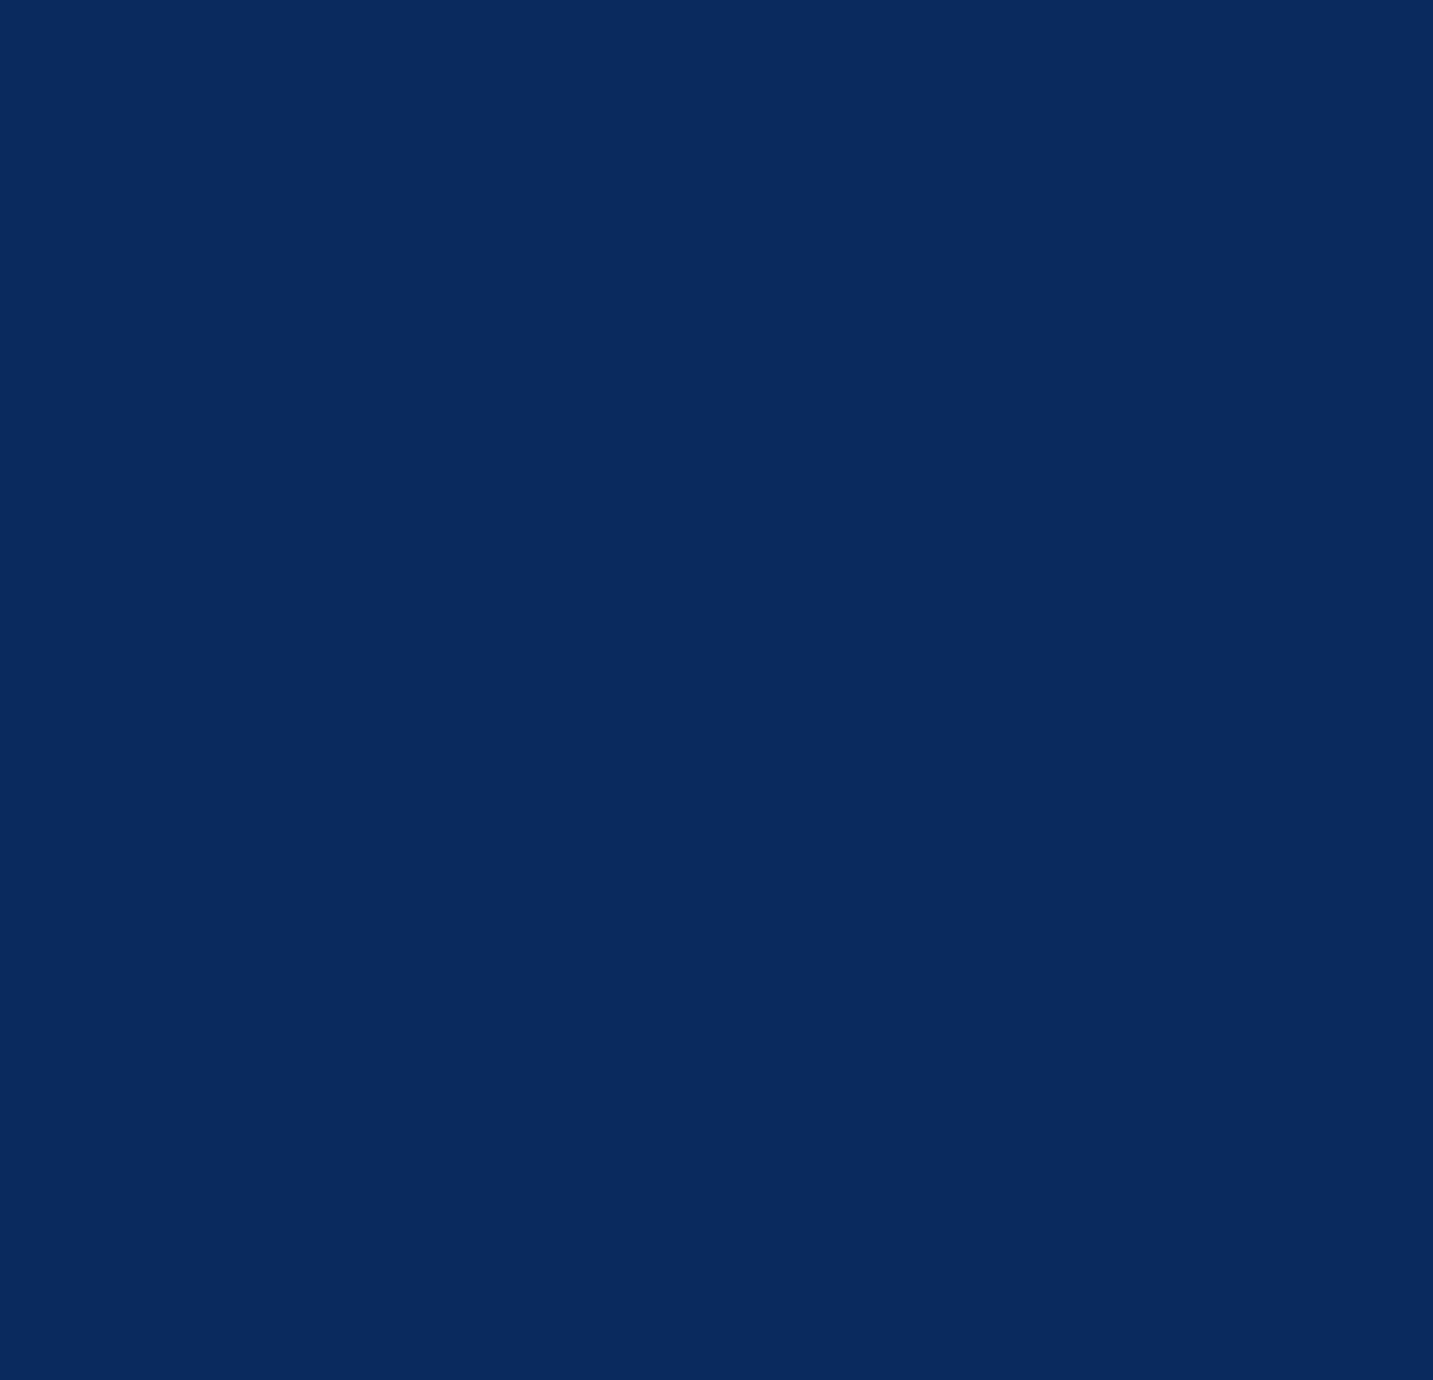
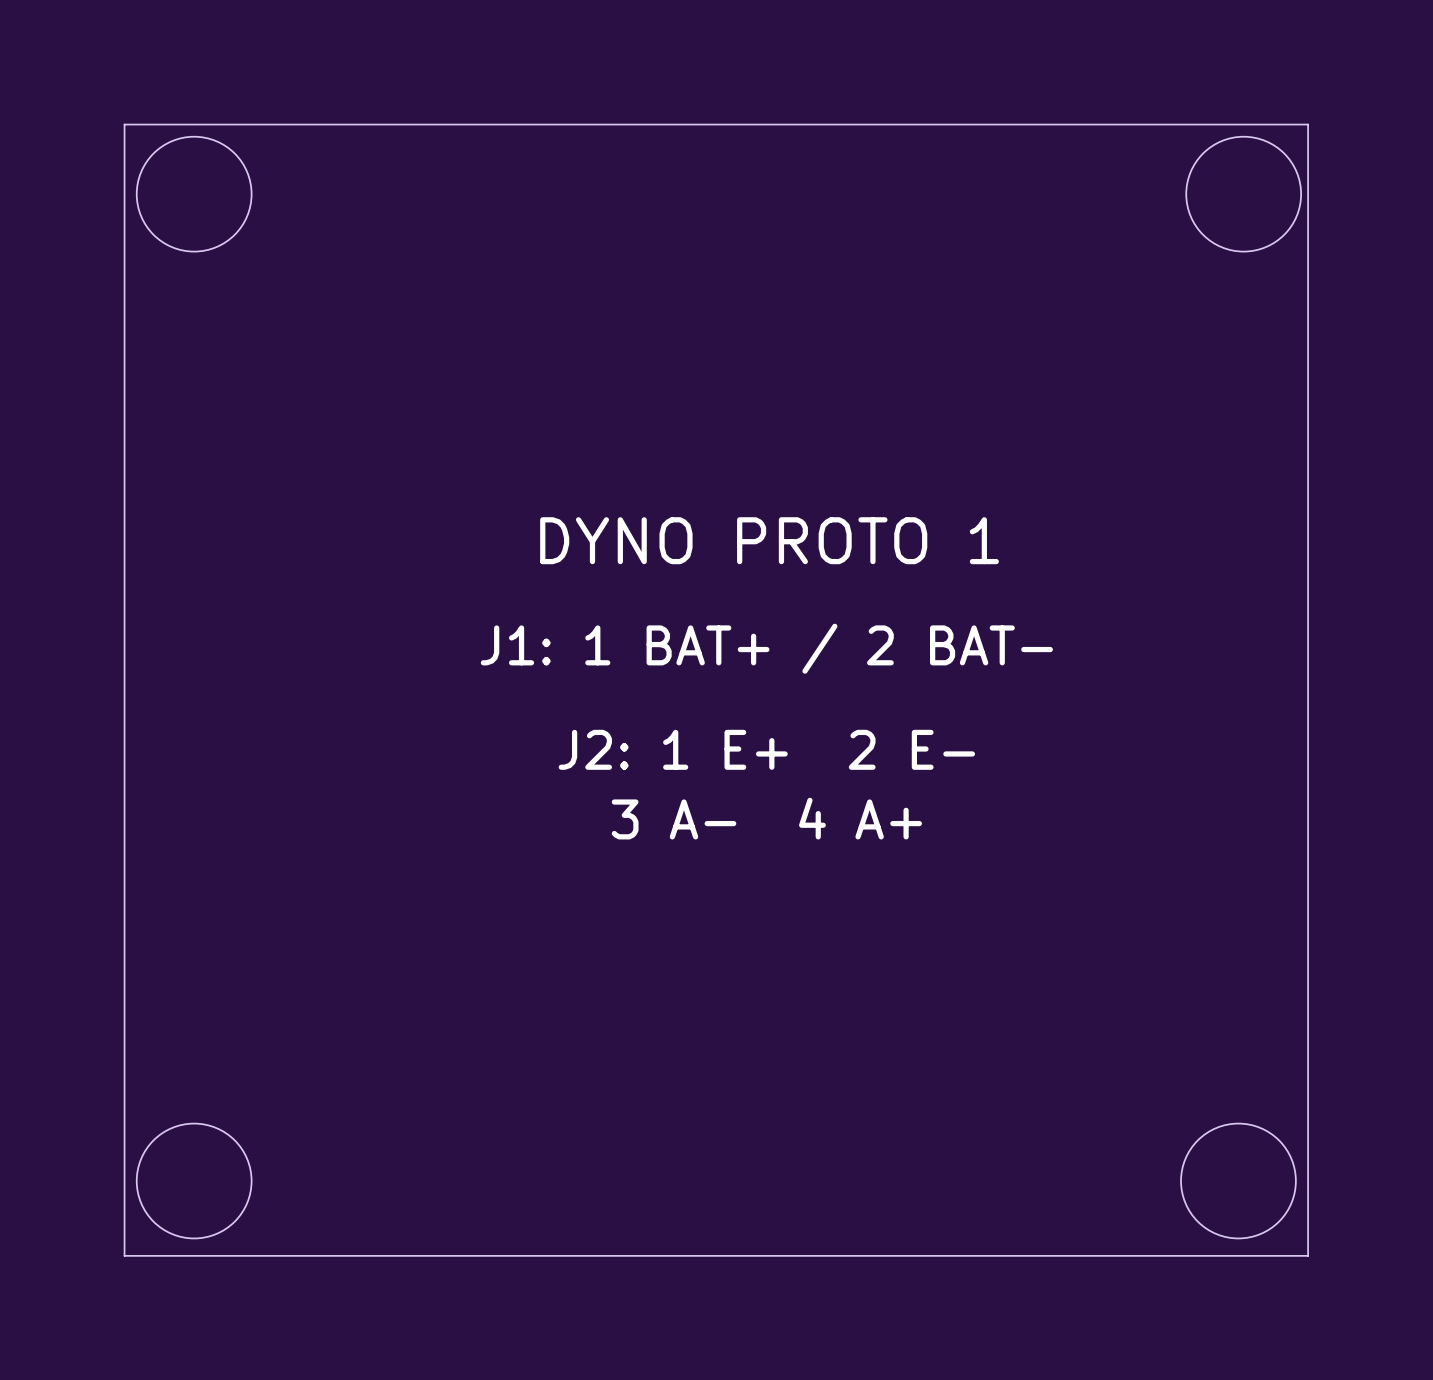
board edge: none -> (1308, 124) (1308, 1255) (124, 1255) (124, 124) (1308, 124)
round board edge: none -> [135, 135, 253, 253]
round board edge: none -> [1185, 135, 1302, 253]
text: none -> DYNO PROTO 1 (769, 540)
text: none -> J1: 1 BAT+ / 2 BAT- (766, 648)
text: none -> J2: 1 E+ 2 E- (766, 749)
text: none -> 3 A- 4 A+ (766, 818)
round board edge: none -> [135, 1122, 253, 1240]
round board edge: none -> [1180, 1122, 1297, 1240]

